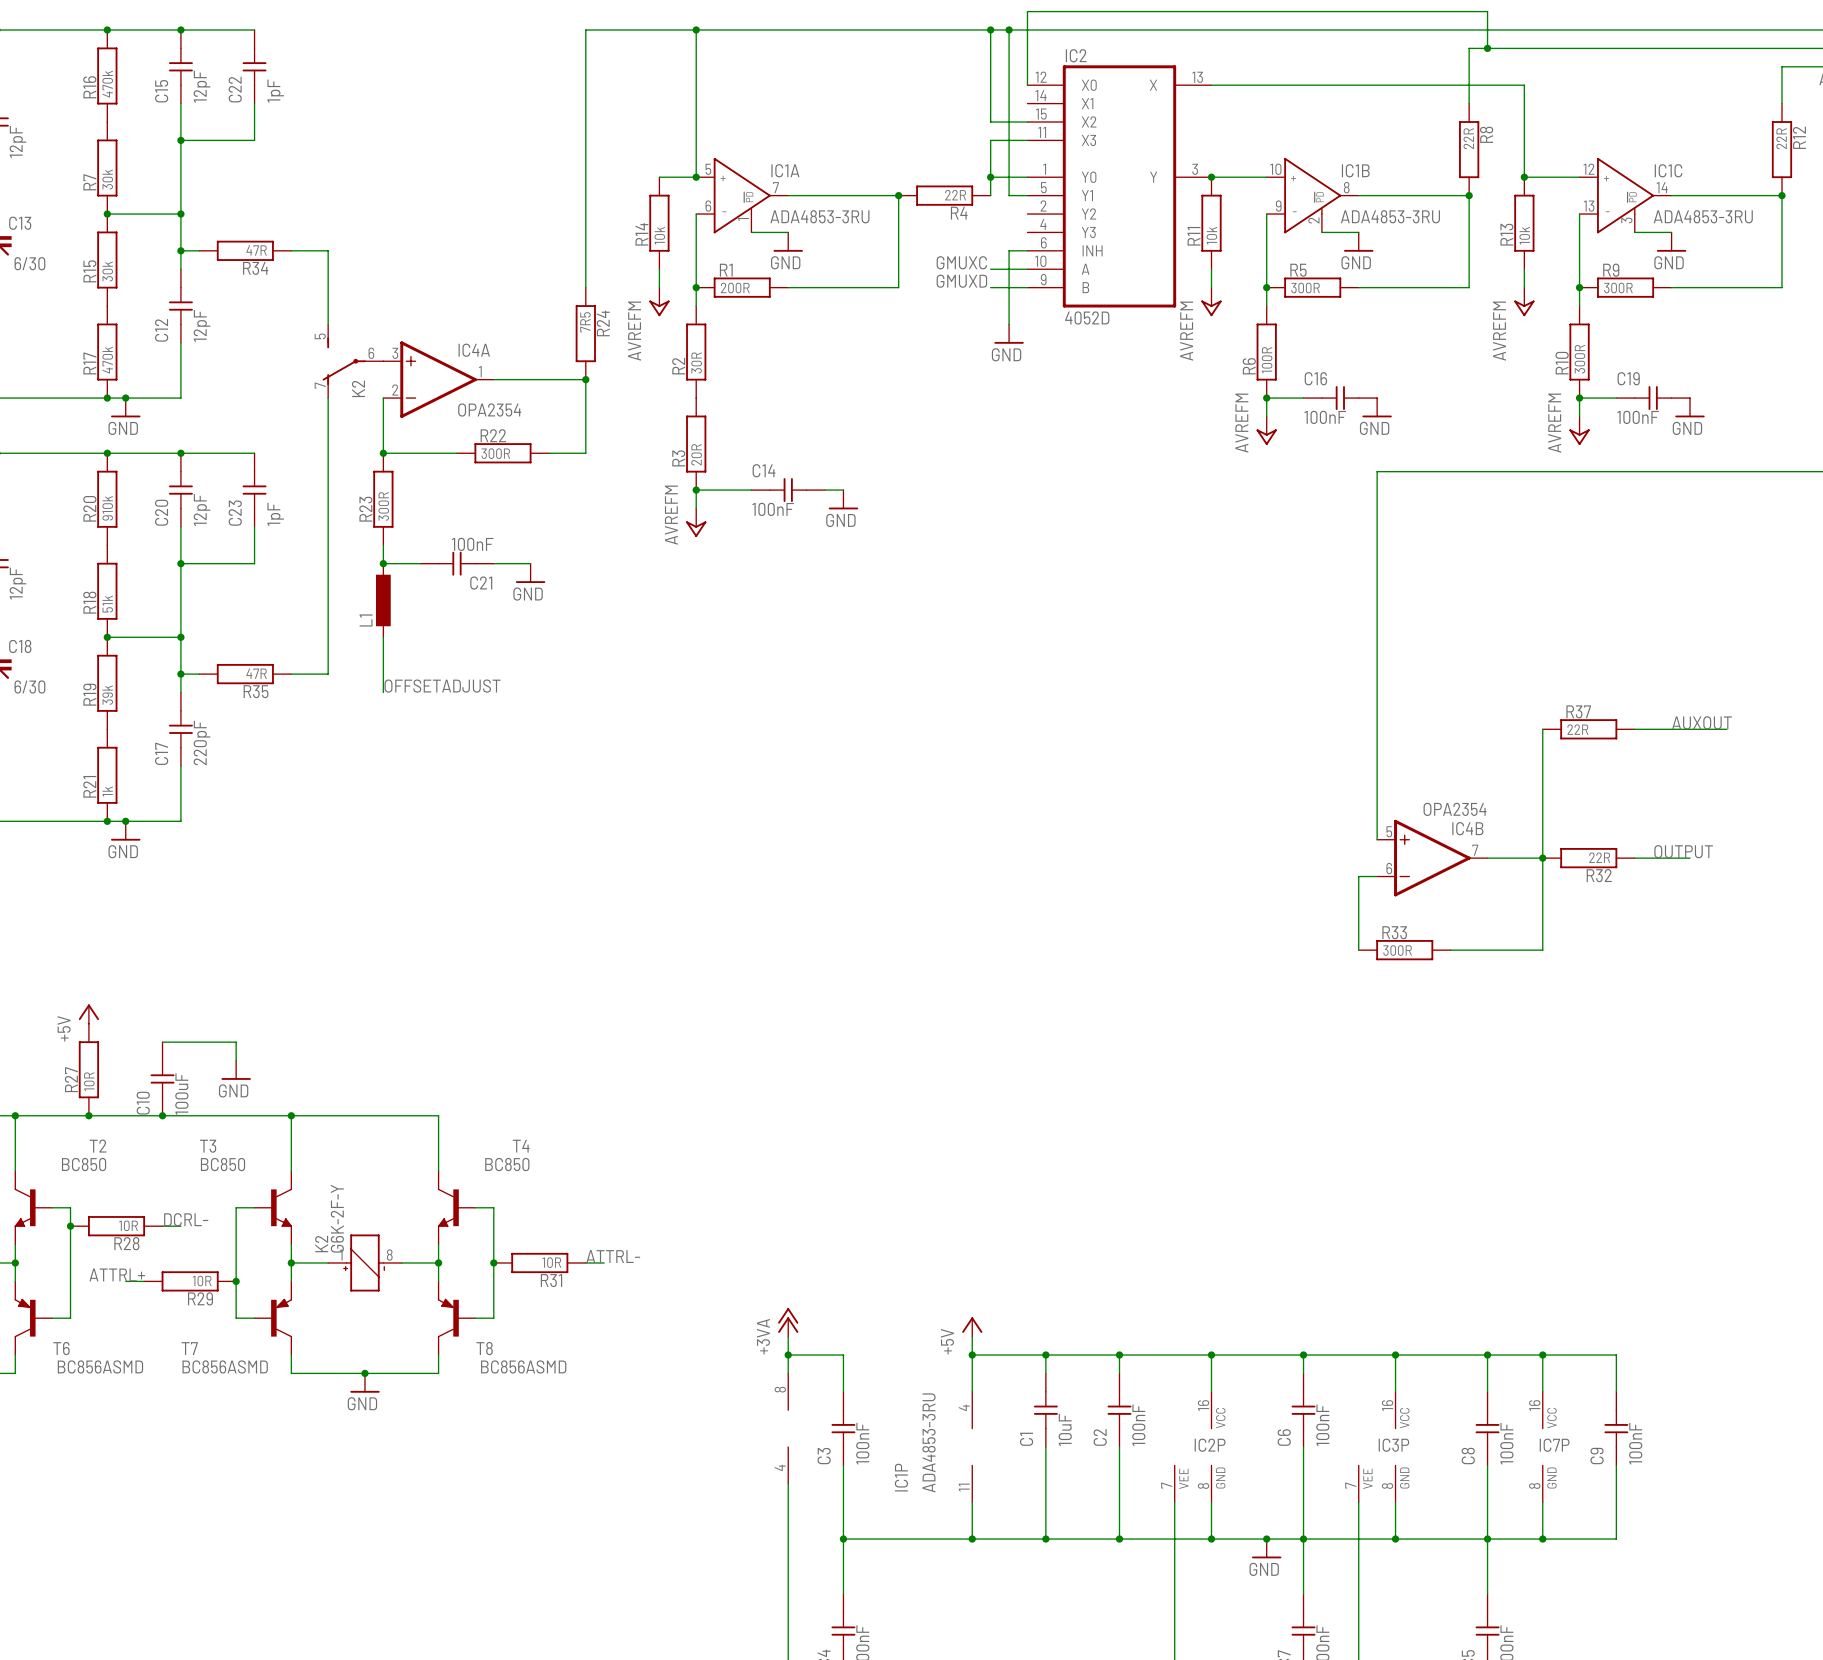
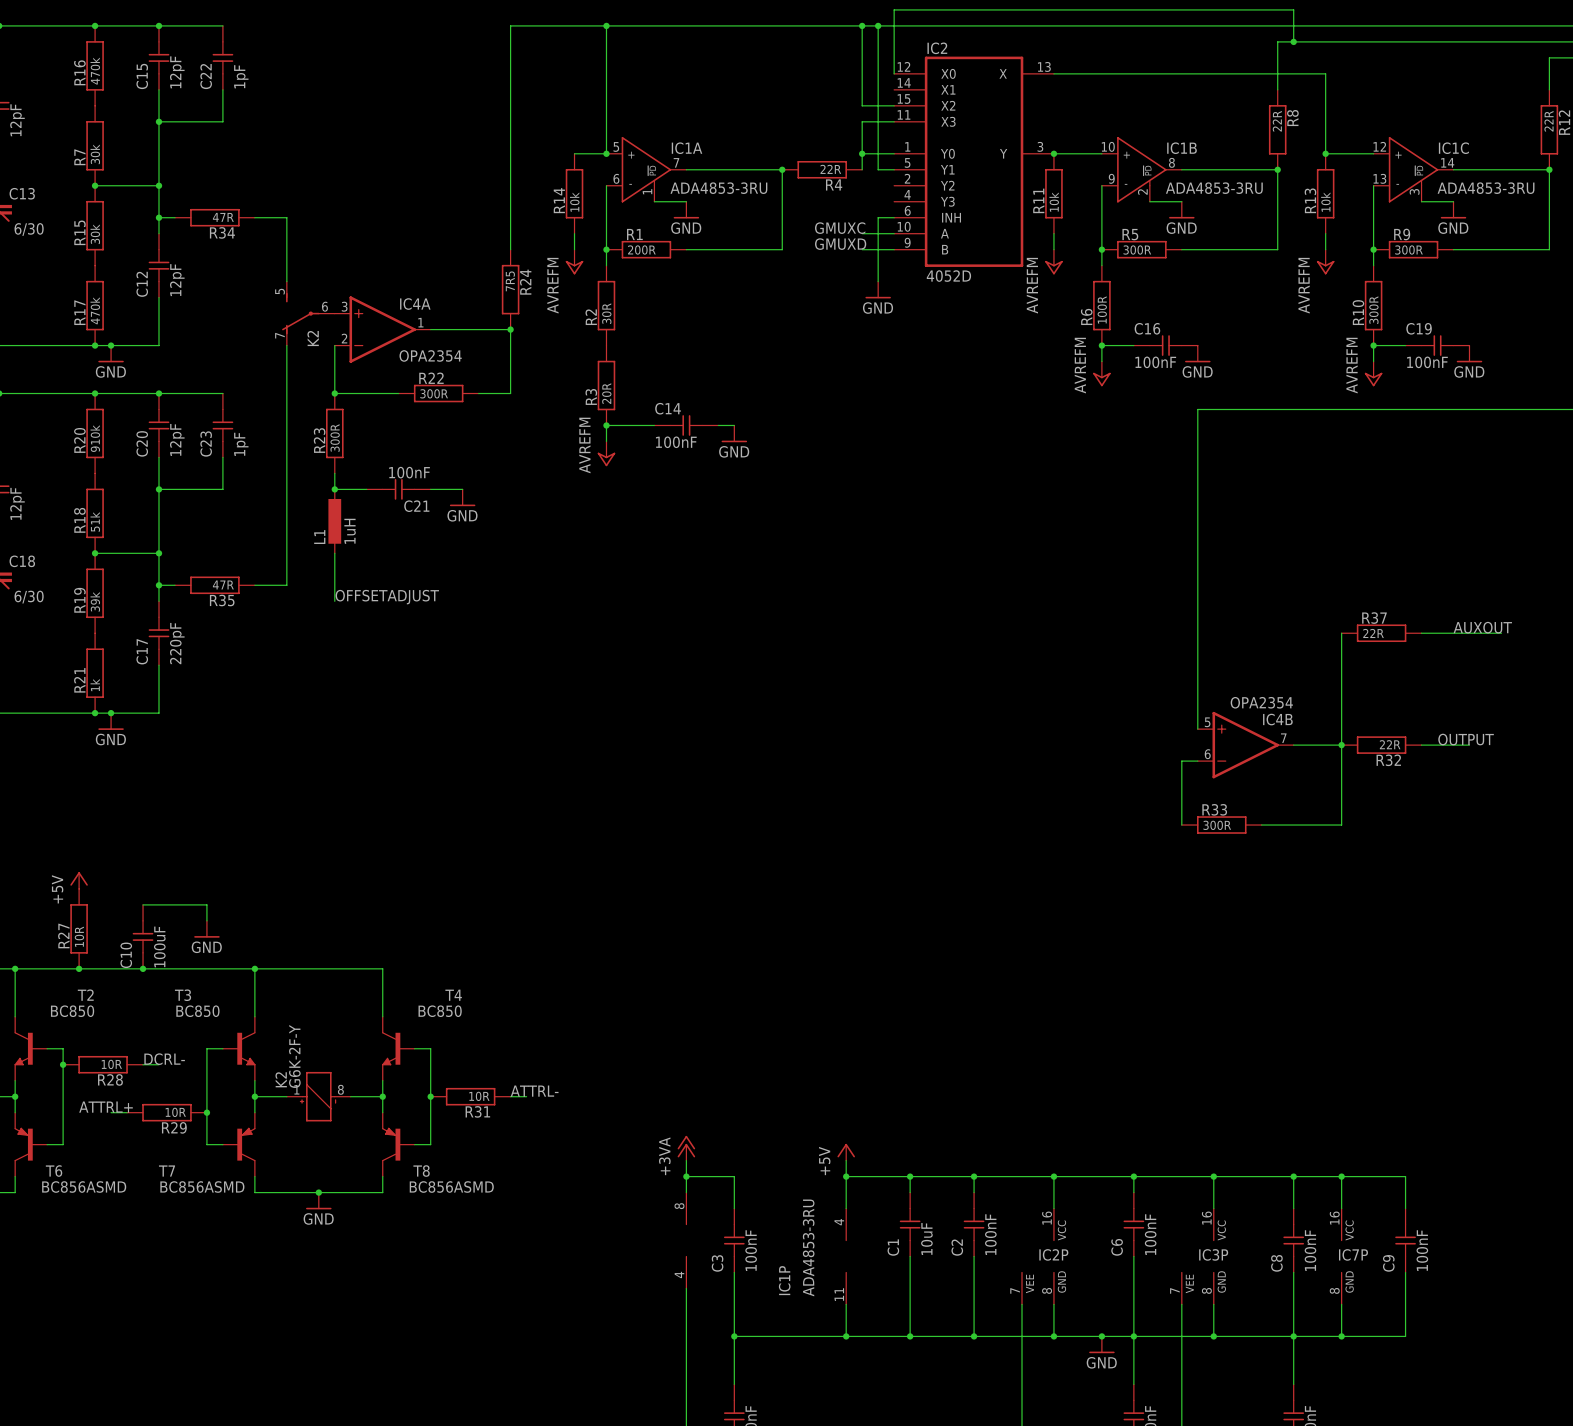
L1 value: none -> 1uH (350, 531)

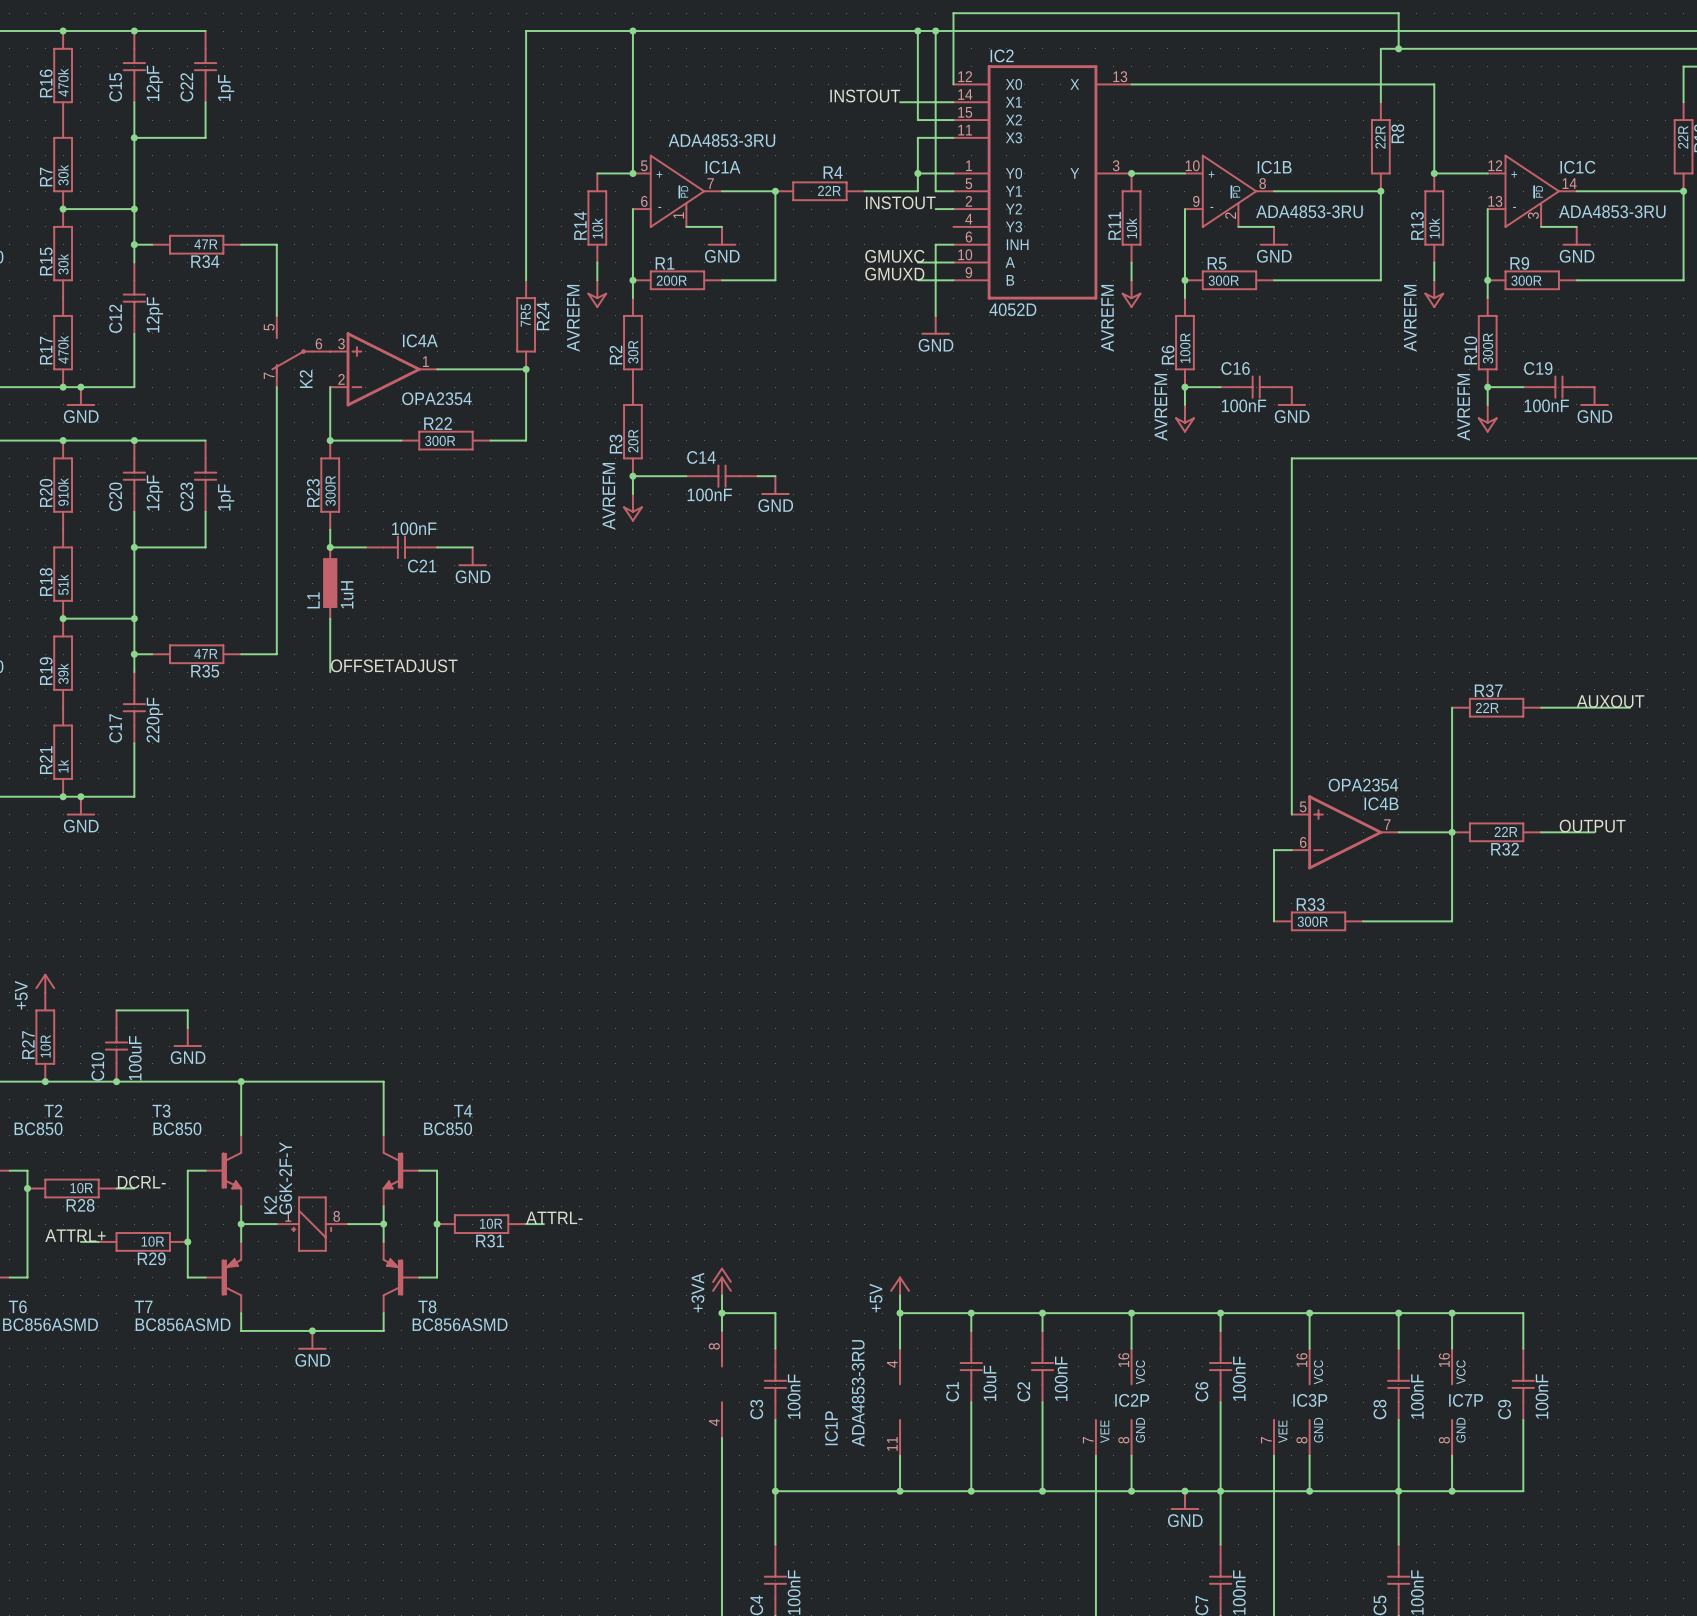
label: none -> INSTOUT (865, 96)
wire: none -> (900, 102) (953, 102)
wire: (734, 169) (782, 169) (782, 249) (734, 249) -> (775, 191) (775, 280)
junction: none -> (775, 191)
junction: (782, 169) -> none
wire: none -> (864, 191) (917, 191)
R4 position: (822, 169) -> (819, 191)
label: none -> INSTOUT (900, 202)
R4 name position: R4 (834, 184) -> R4 (833, 172)
wire: none -> (935, 209) (953, 209)
IC1A value position: ADA4853-3RU (718, 188) -> ADA4853-3RU (721, 140)

